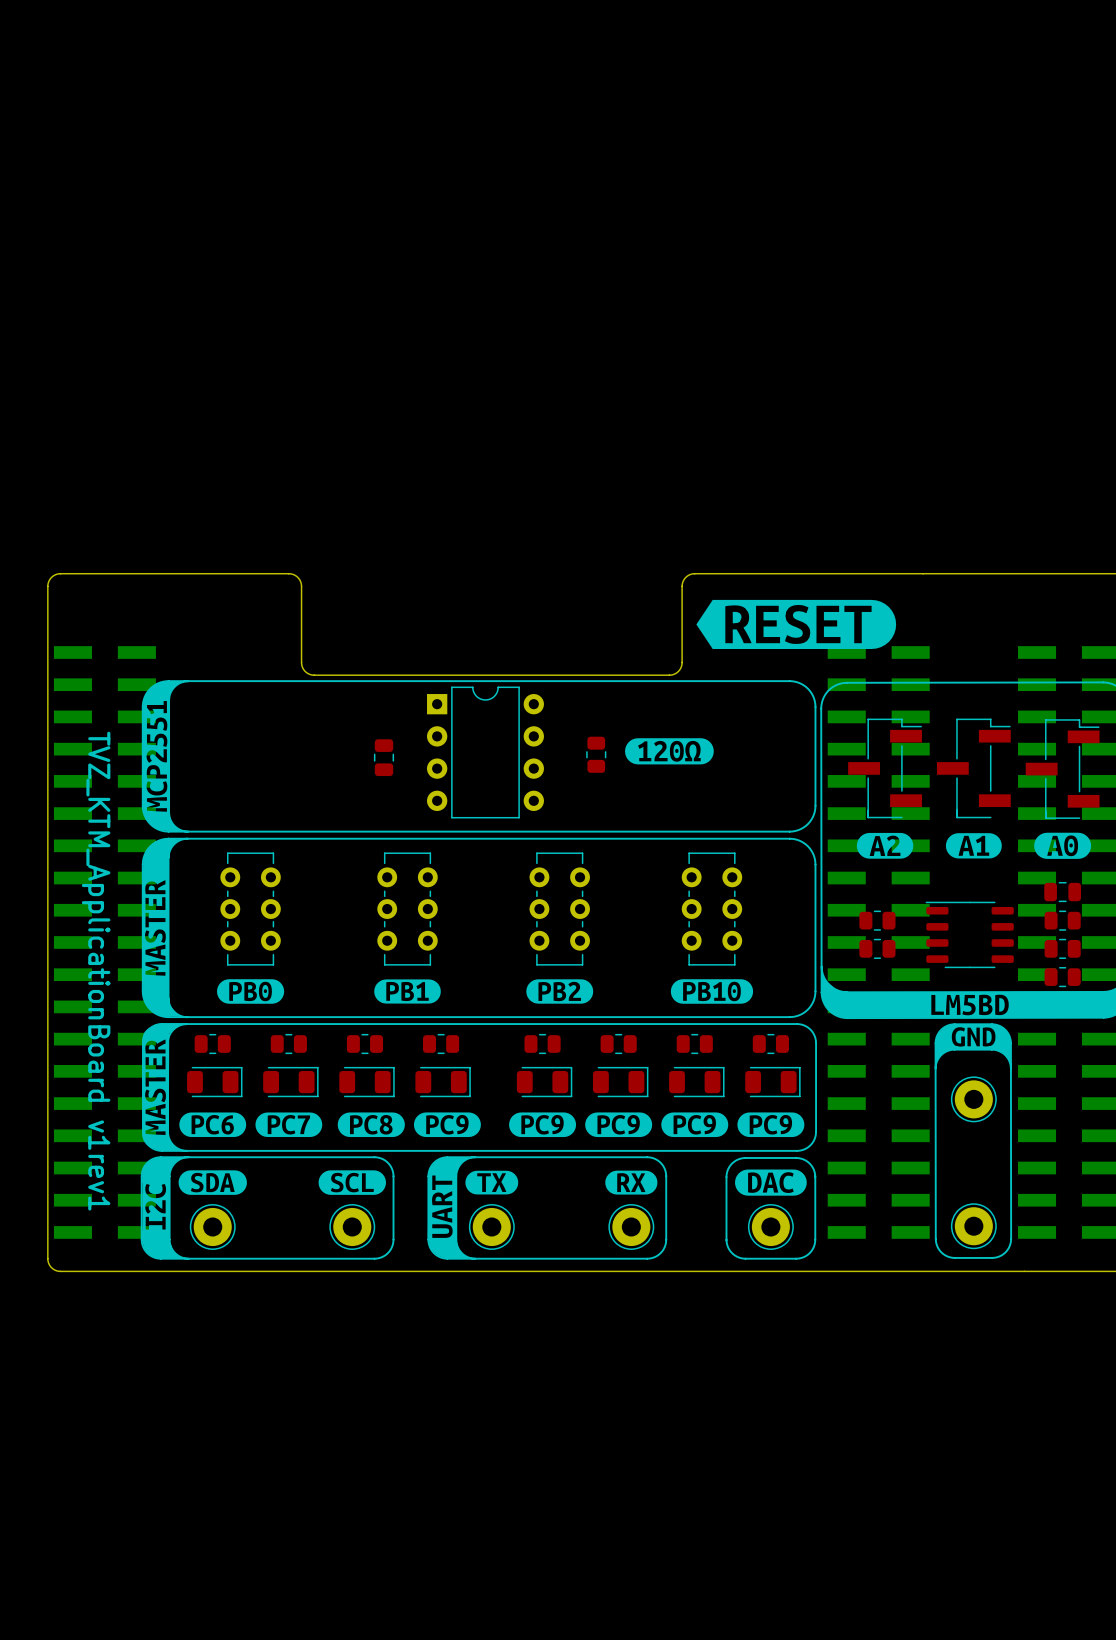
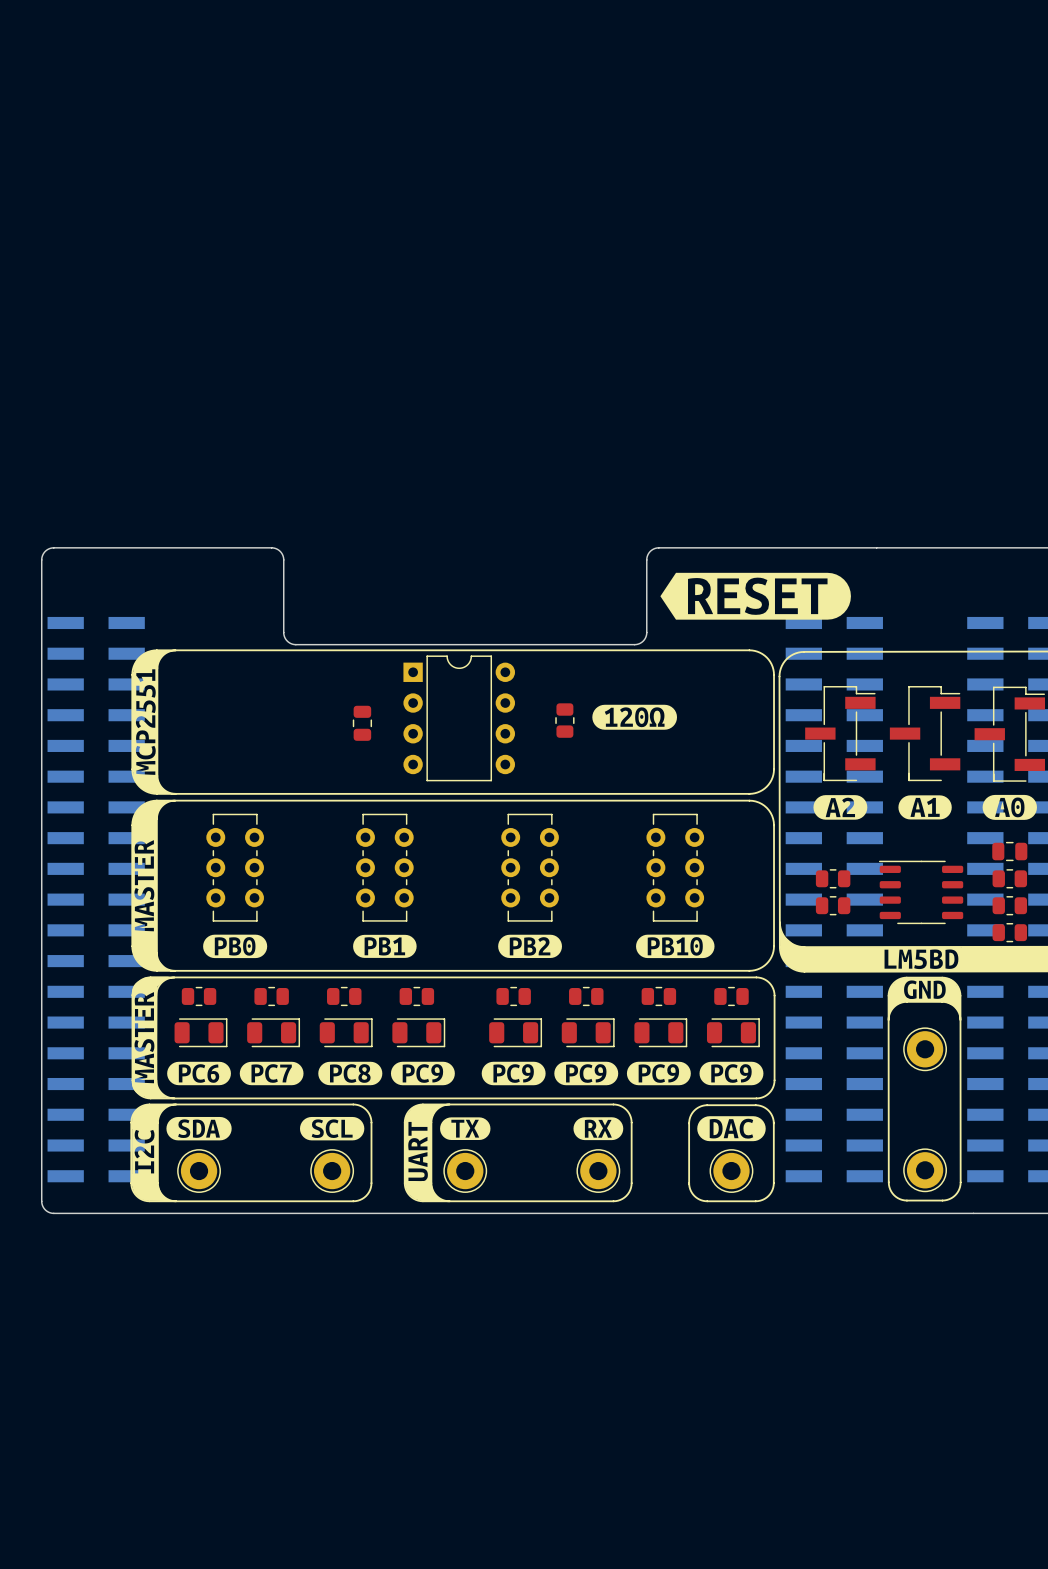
text: TVZ_KTM_ApplicationBoard v1rev1 (96, 971) -> none

